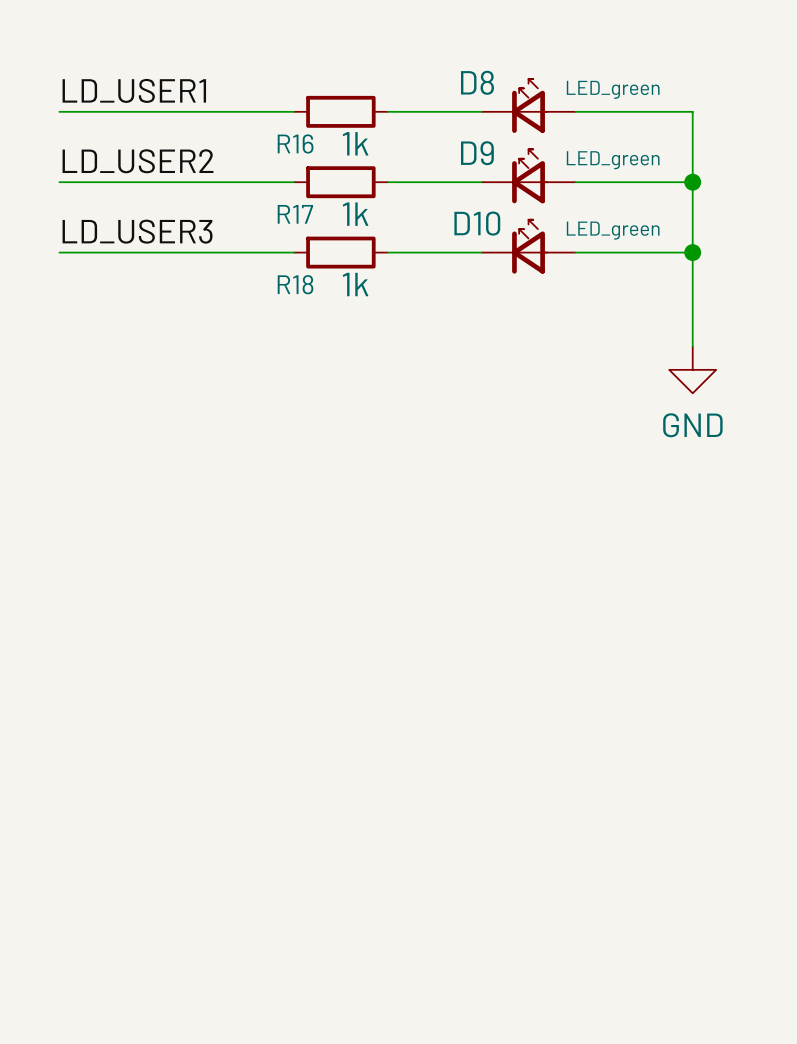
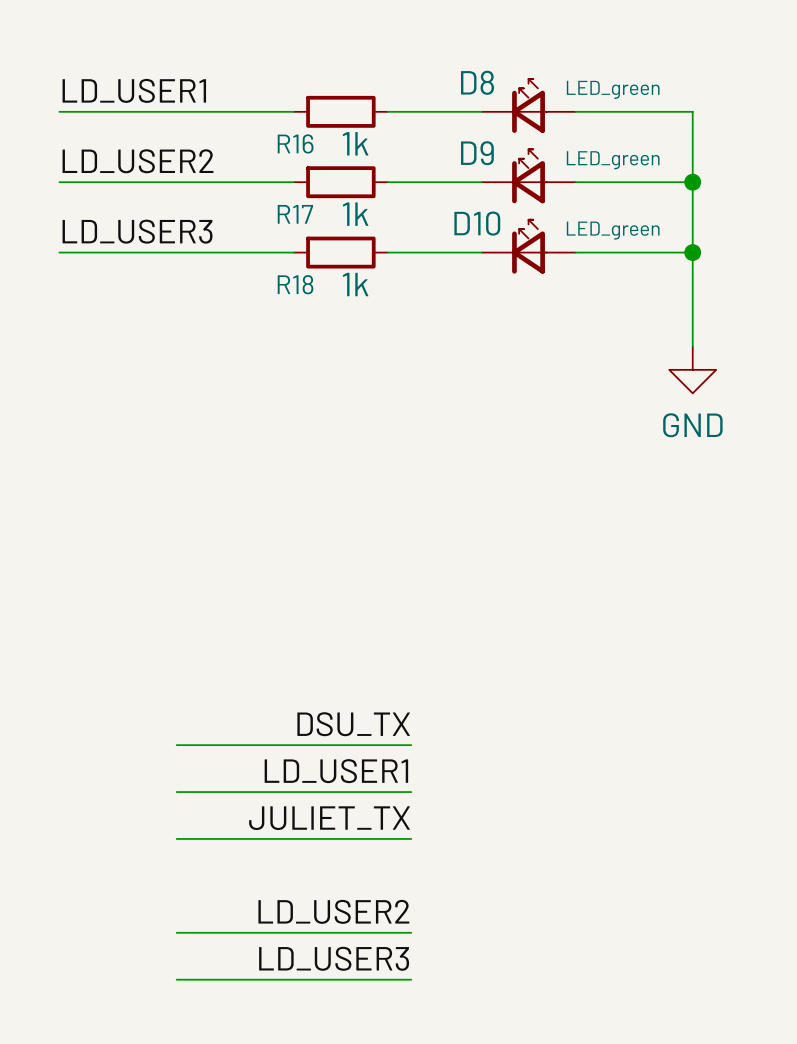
label: none -> DSU_TX (353, 724)
wire: none -> (176, 745) (411, 745)
label: none -> LD_USER1 (336, 771)
wire: none -> (176, 792) (411, 792)
label: none -> JULIET_TX (329, 818)
wire: none -> (176, 838) (411, 838)
label: none -> LD_USER2 (333, 911)
wire: none -> (176, 932) (411, 932)
label: none -> LD_USER3 (334, 958)
wire: none -> (176, 979) (411, 979)

